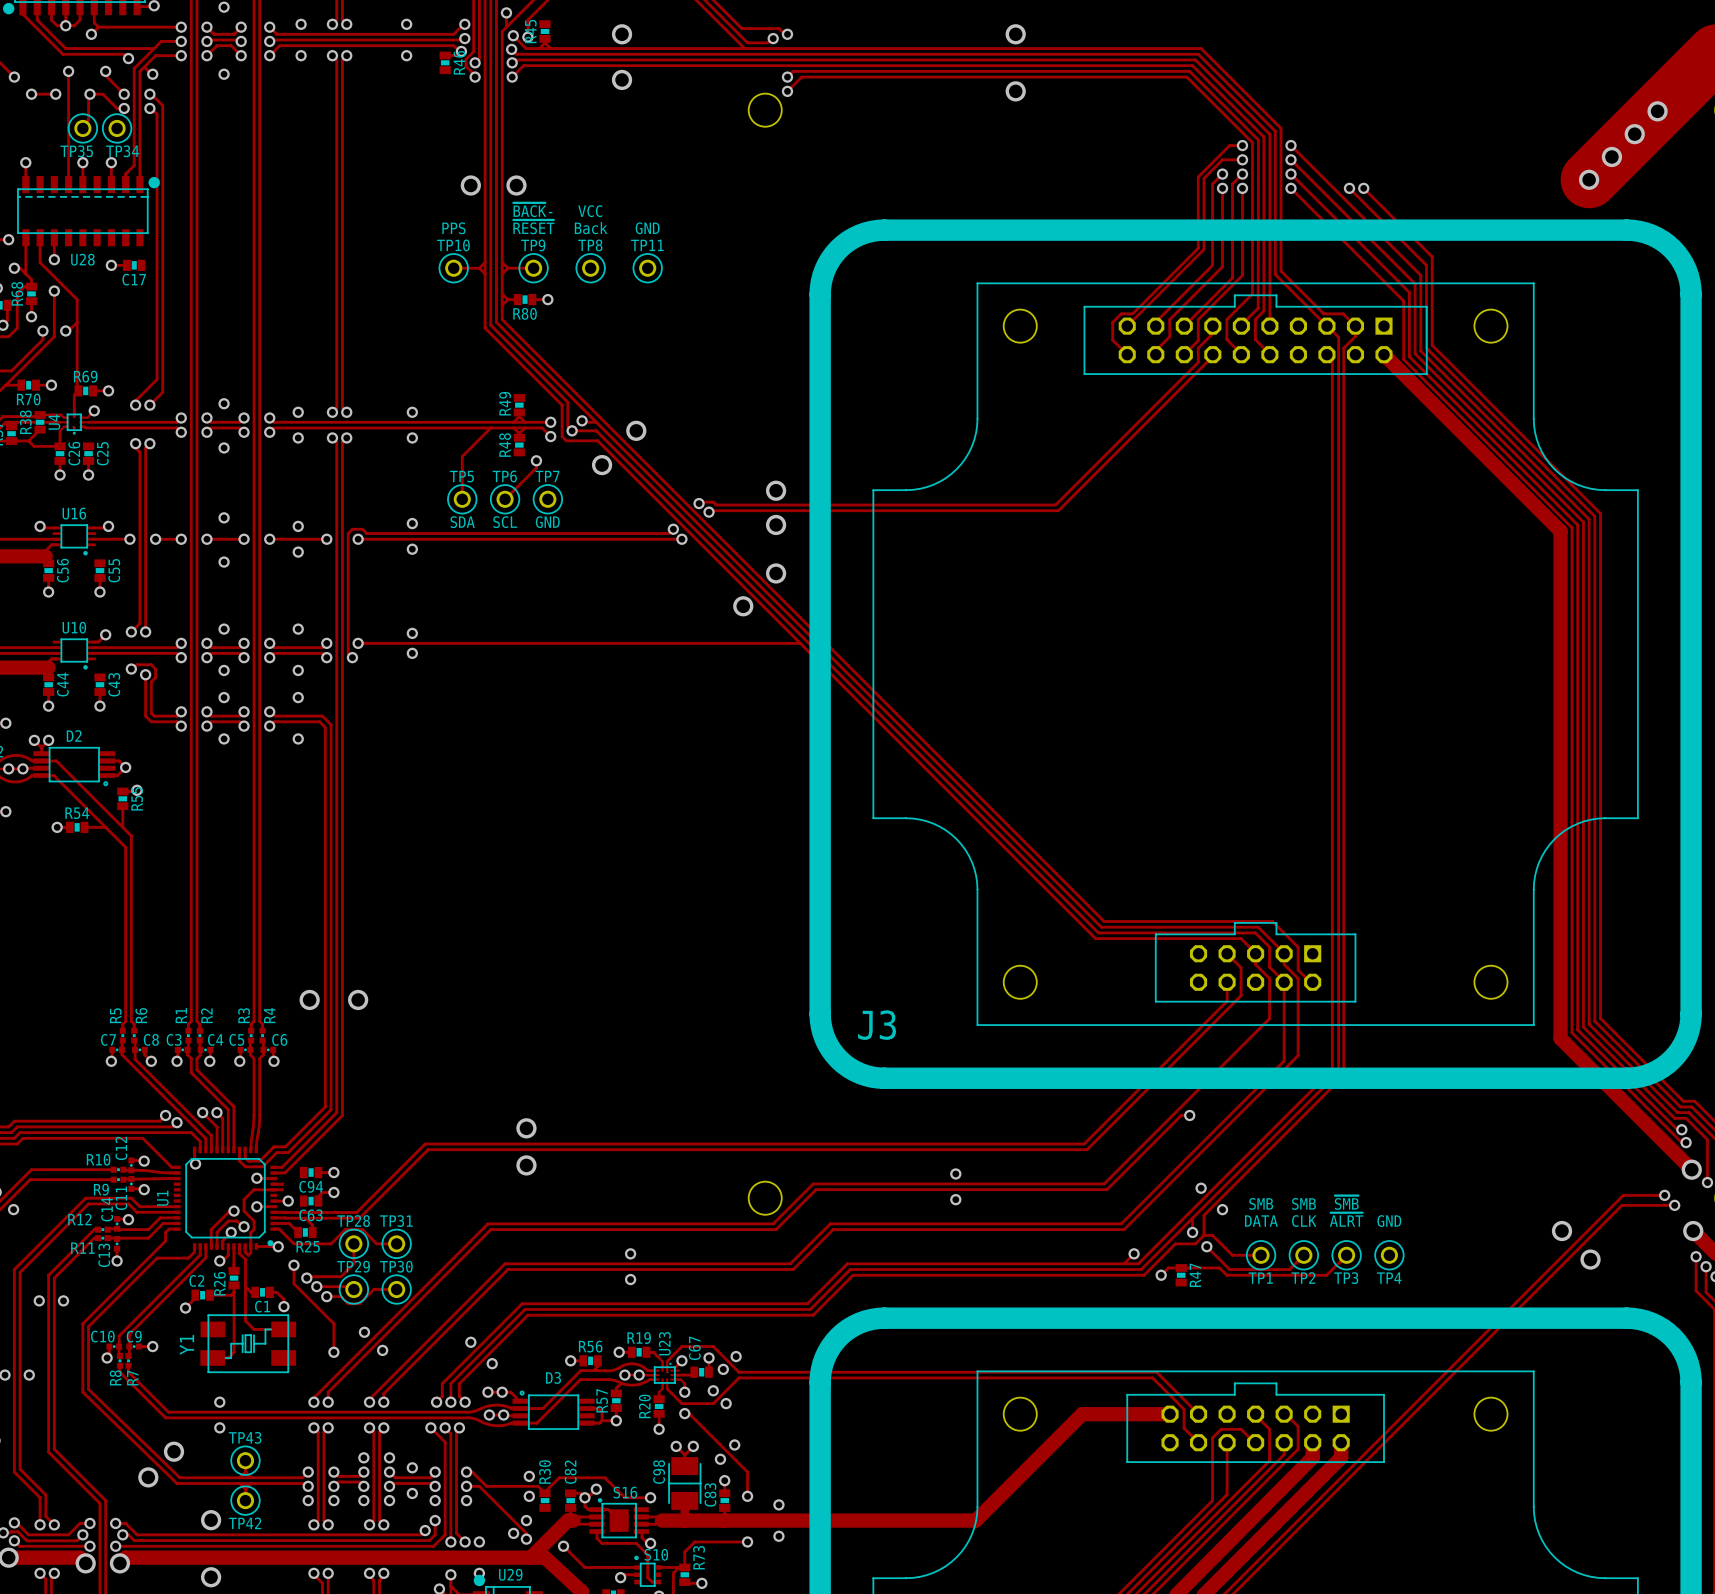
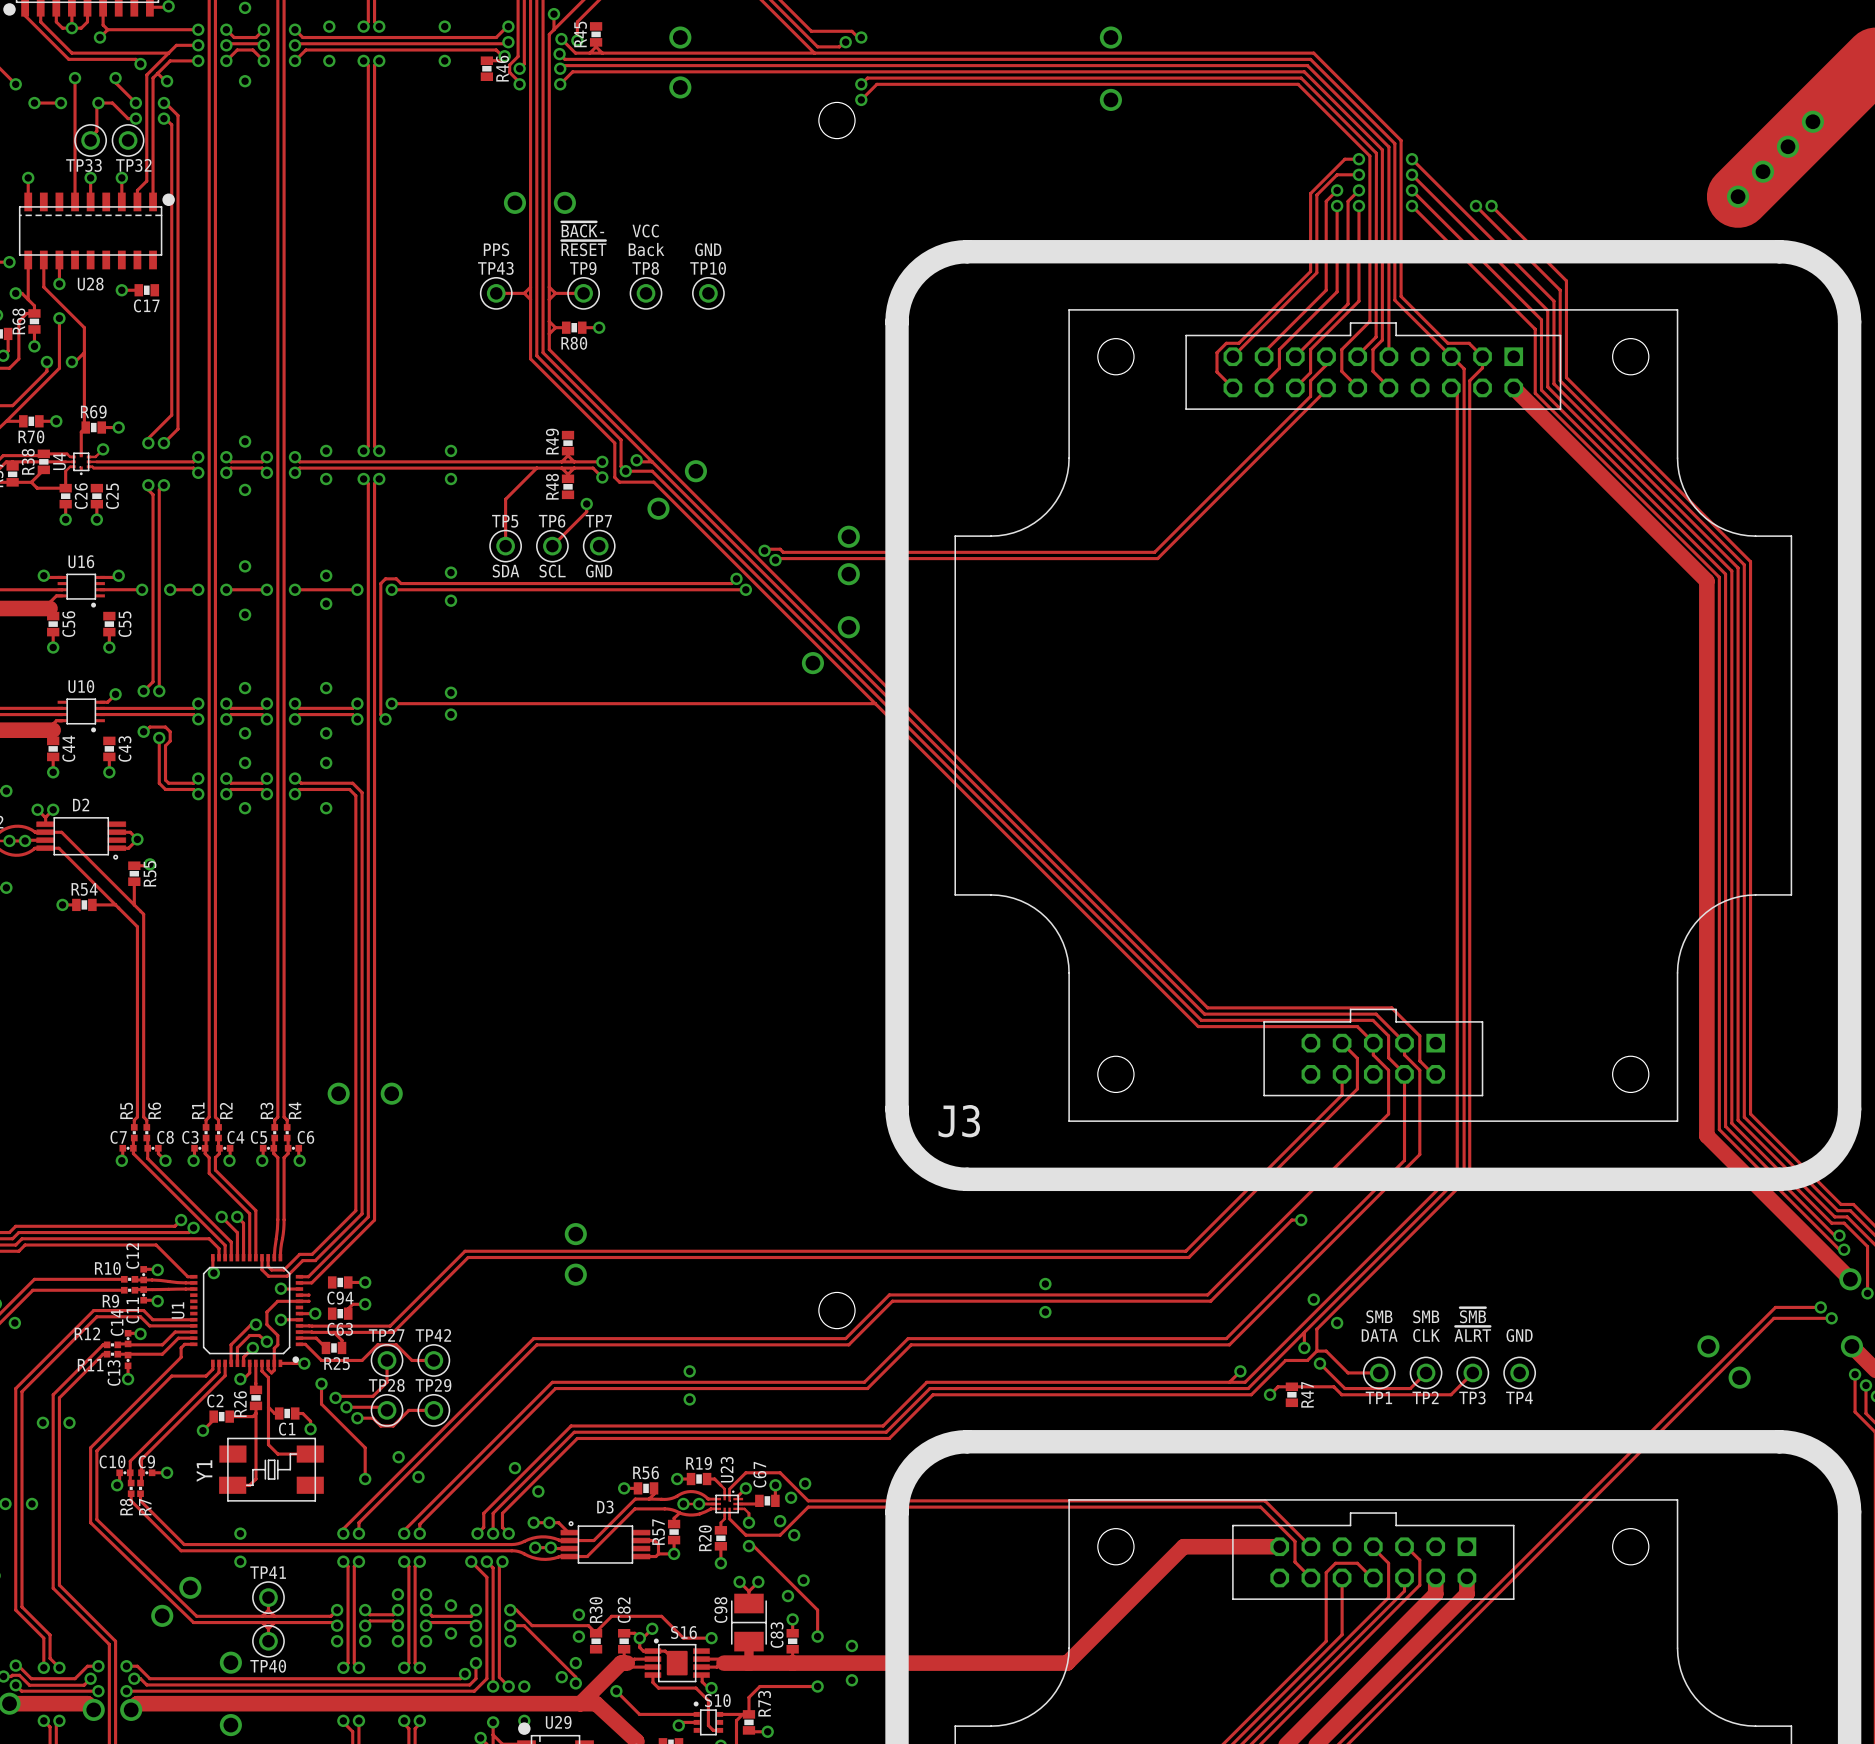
TP35 name: TP35 (76, 151) -> TP33 (83, 165)
TP34 name: TP34 (122, 151) -> TP32 (133, 165)
TP10 name: TP10 (453, 245) -> TP43 (495, 268)
TP11 name: TP11 (647, 245) -> TP10 (708, 268)
TP28 name: TP28 (353, 1221) -> TP27 (386, 1335)
TP31 name: TP31 (396, 1221) -> TP42 (433, 1335)
TP29 name: TP29 (353, 1266) -> TP28 (386, 1385)
TP30 name: TP30 (396, 1266) -> TP29 (433, 1385)
TP43 name: TP43 (245, 1437) -> TP41 (268, 1572)
TP42 name: TP42 (245, 1523) -> TP40 (268, 1666)

